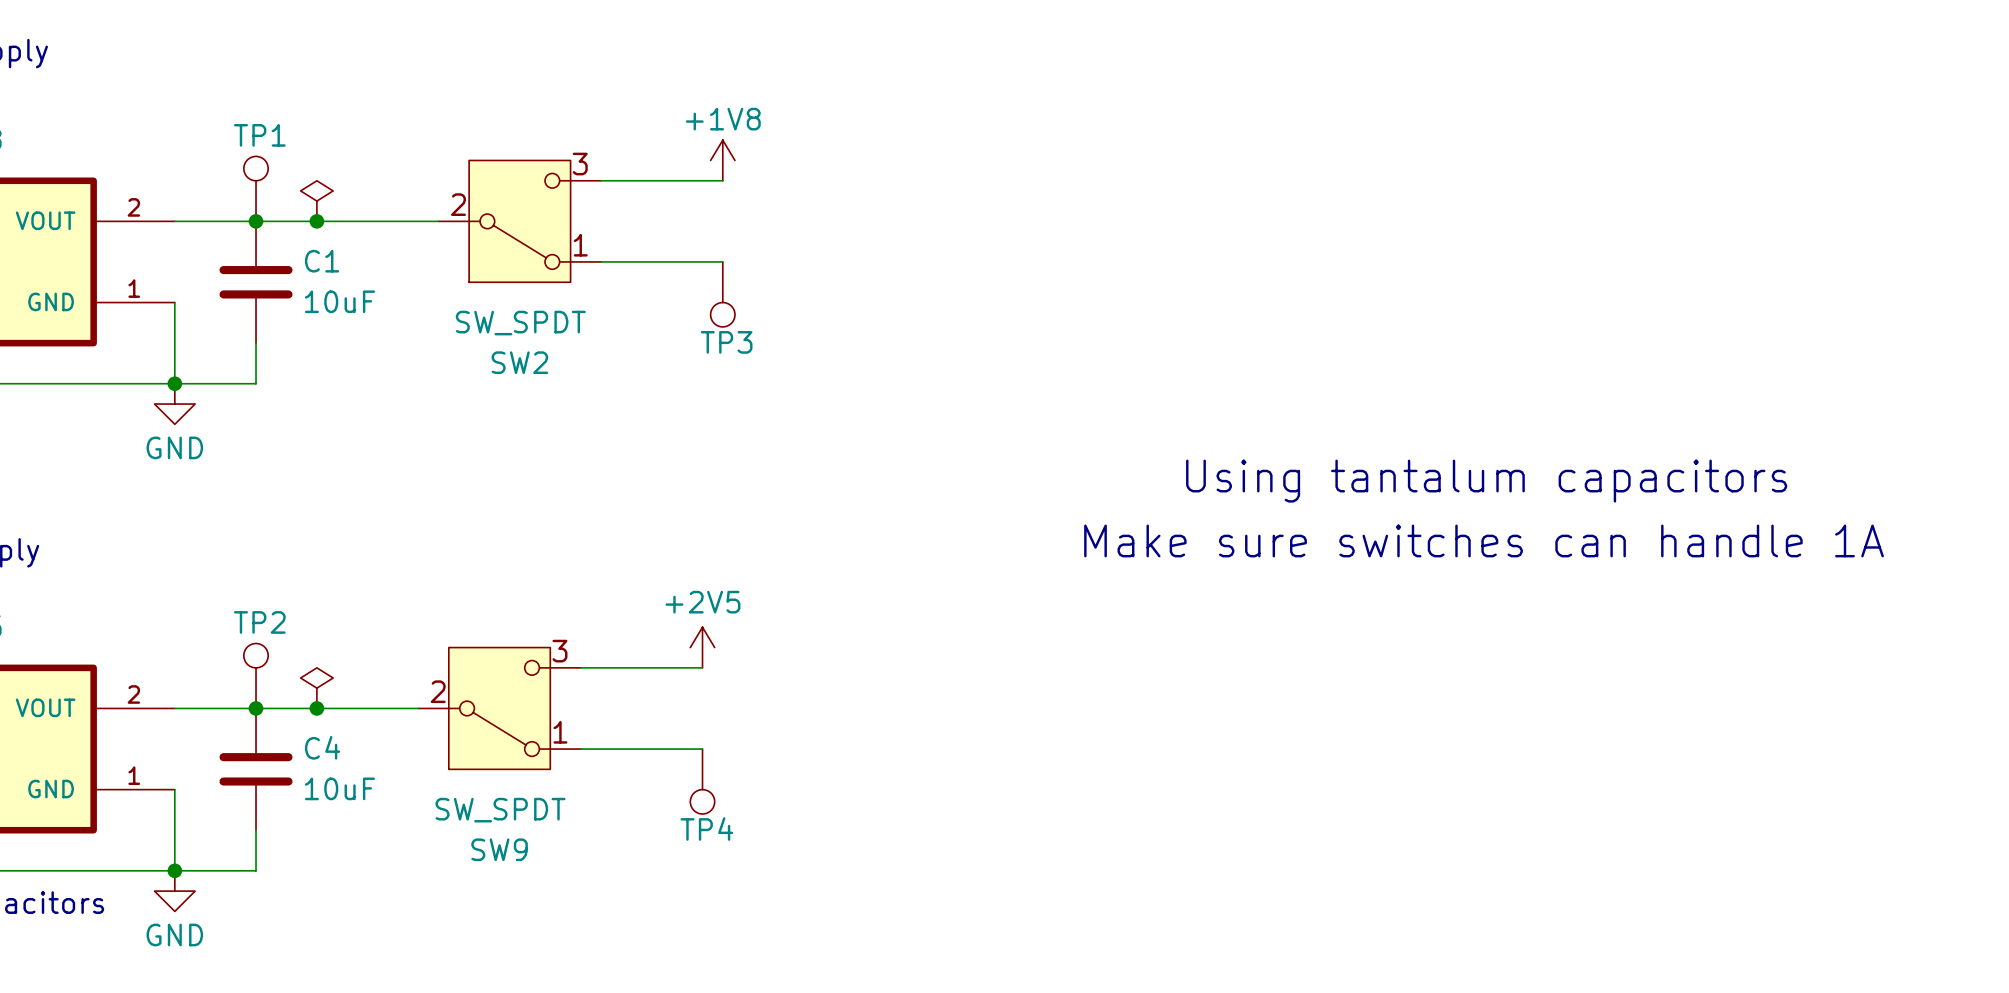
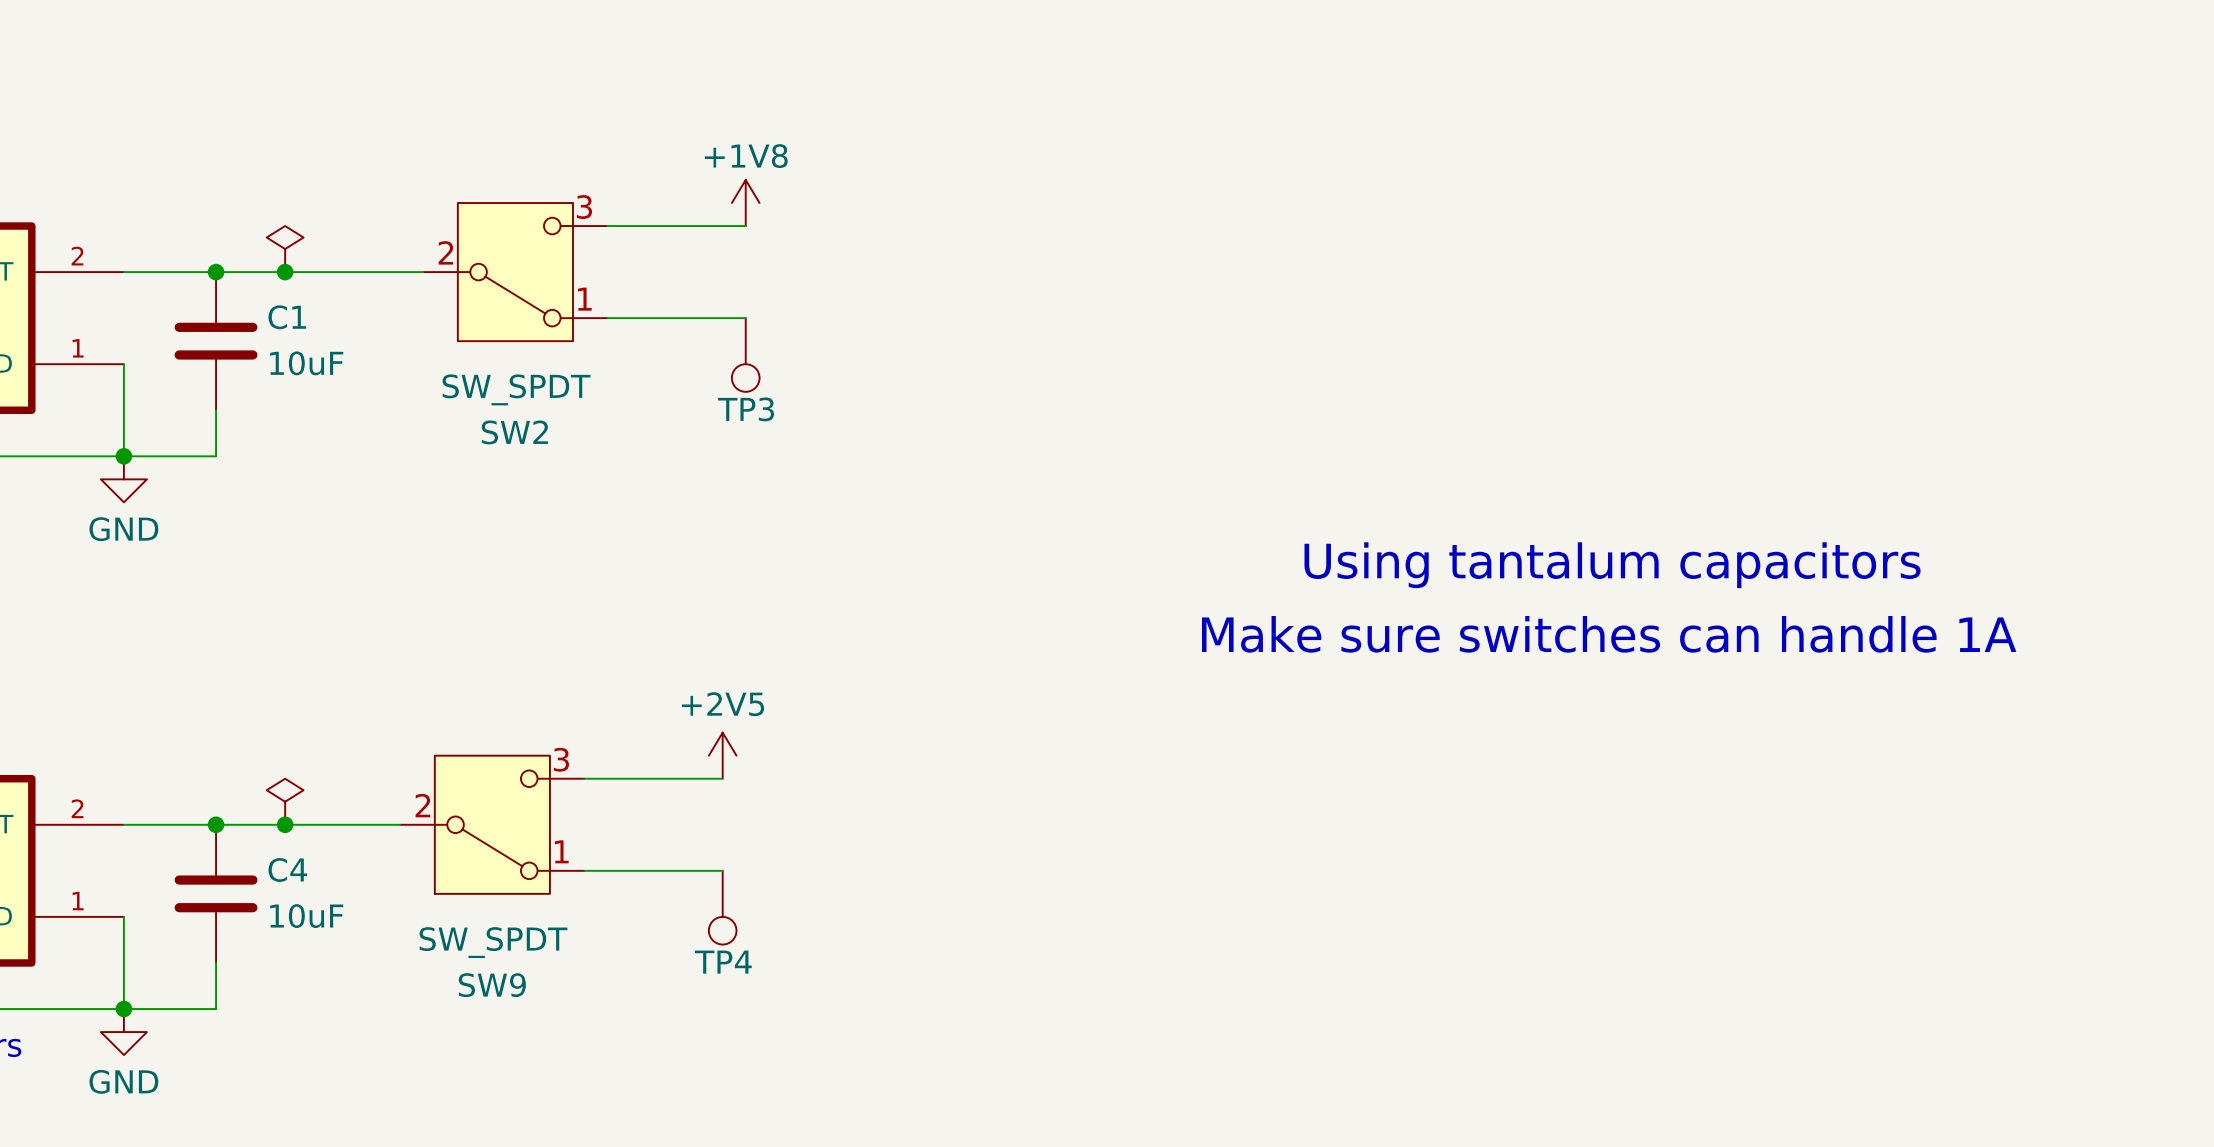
TP1: (256, 188) -> none
TP2: (256, 675) -> none

